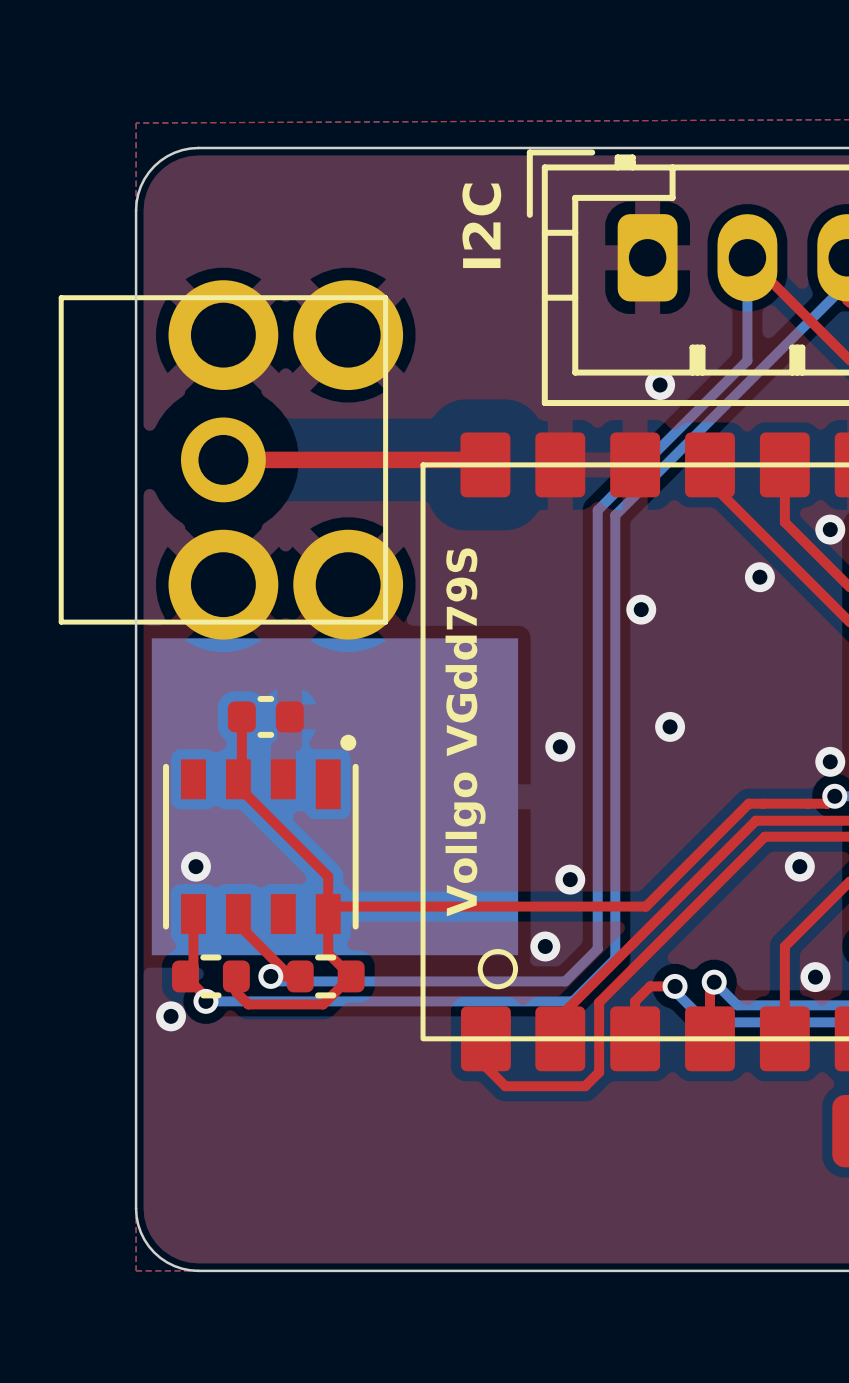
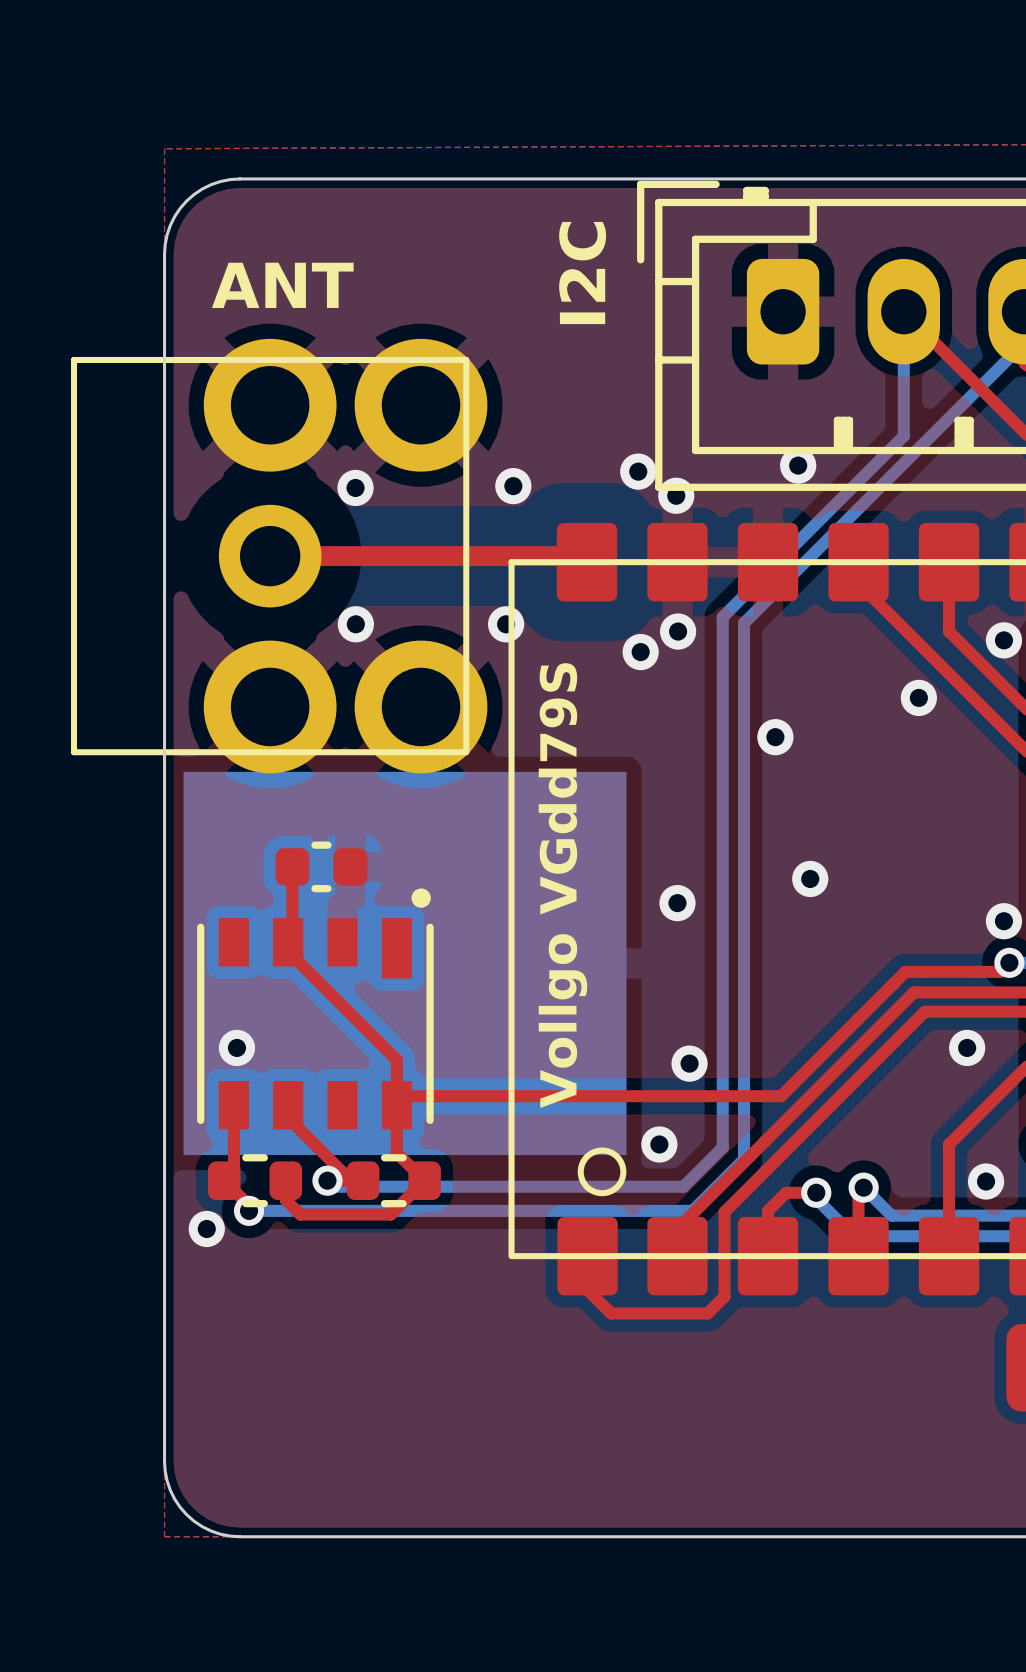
text: none -> ANT (282, 285)
via: none -> (638, 471)
via: none -> (513, 486)
via: none -> (355, 487)
via: none -> (676, 495)
via: none -> (355, 624)
via: none -> (506, 624)
via: none -> (678, 631)
via: none -> (640, 652)

